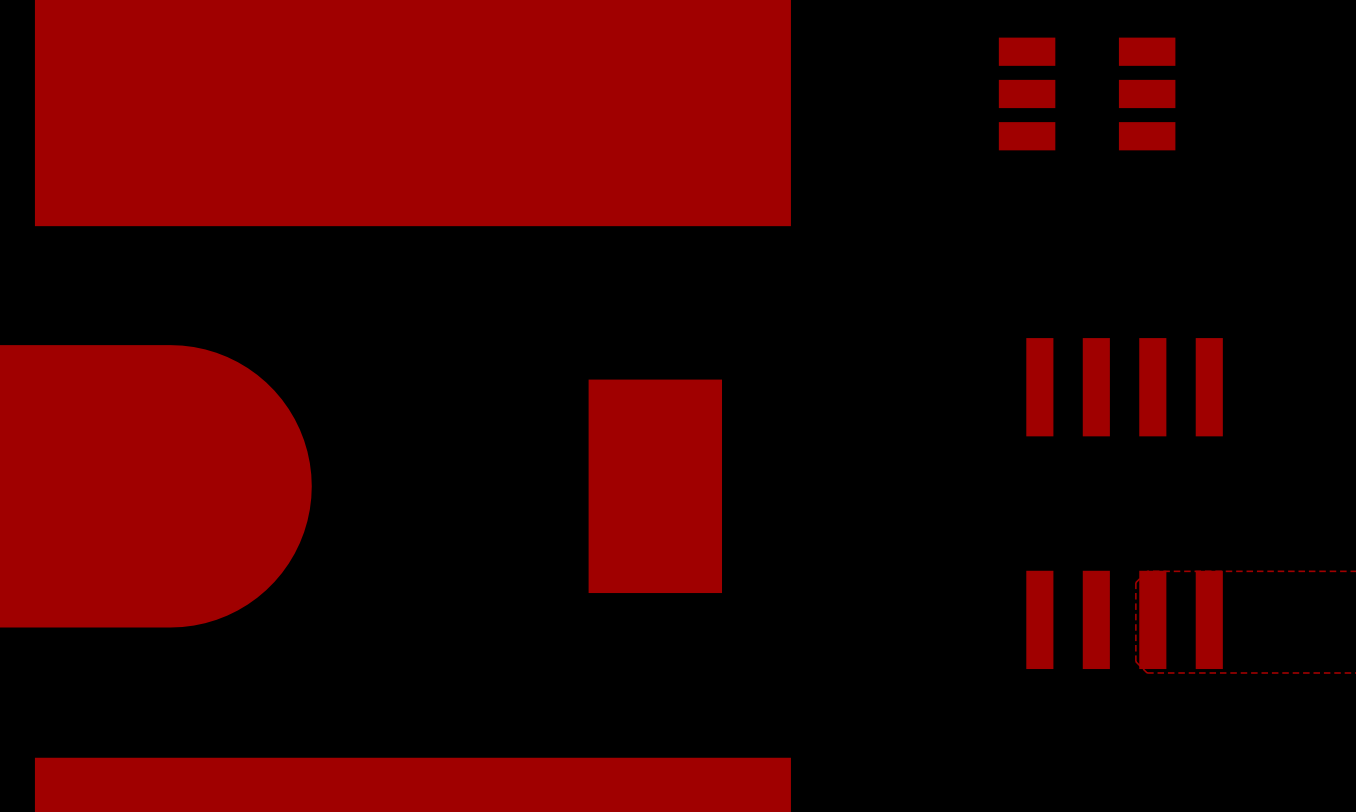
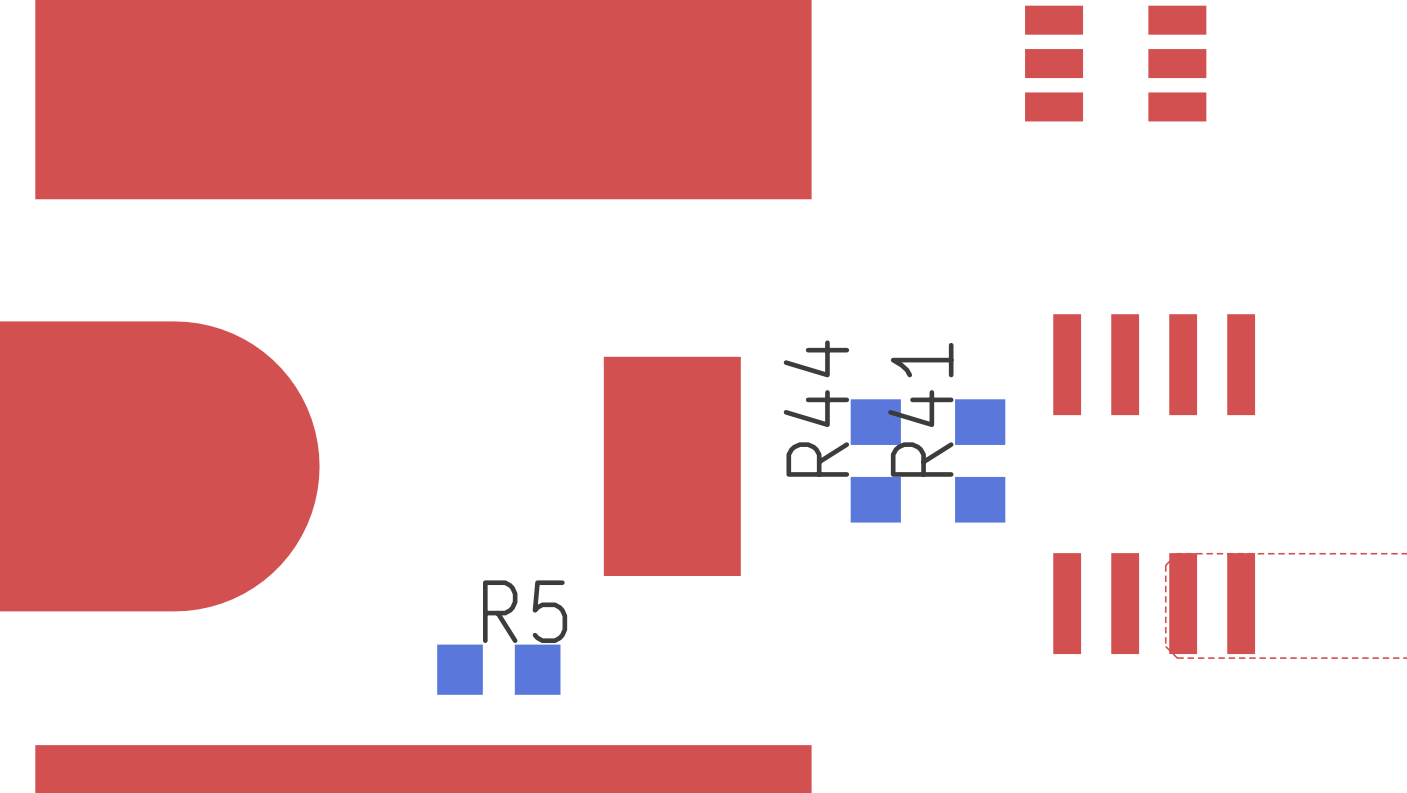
R44: none -> (875, 460)
R41: none -> (980, 460)
R5: none -> (498, 669)

